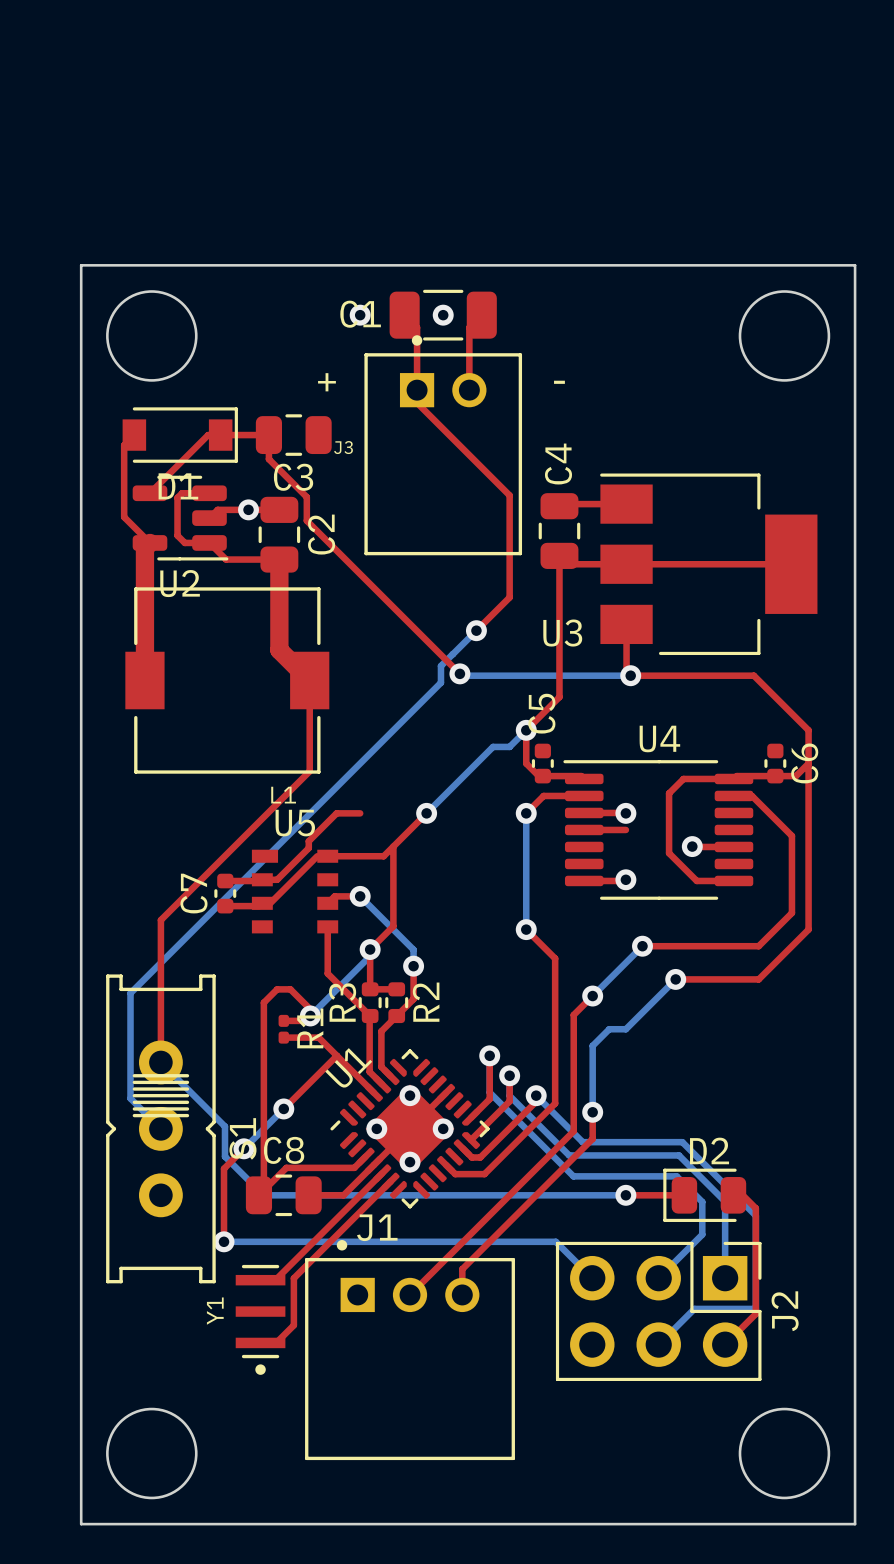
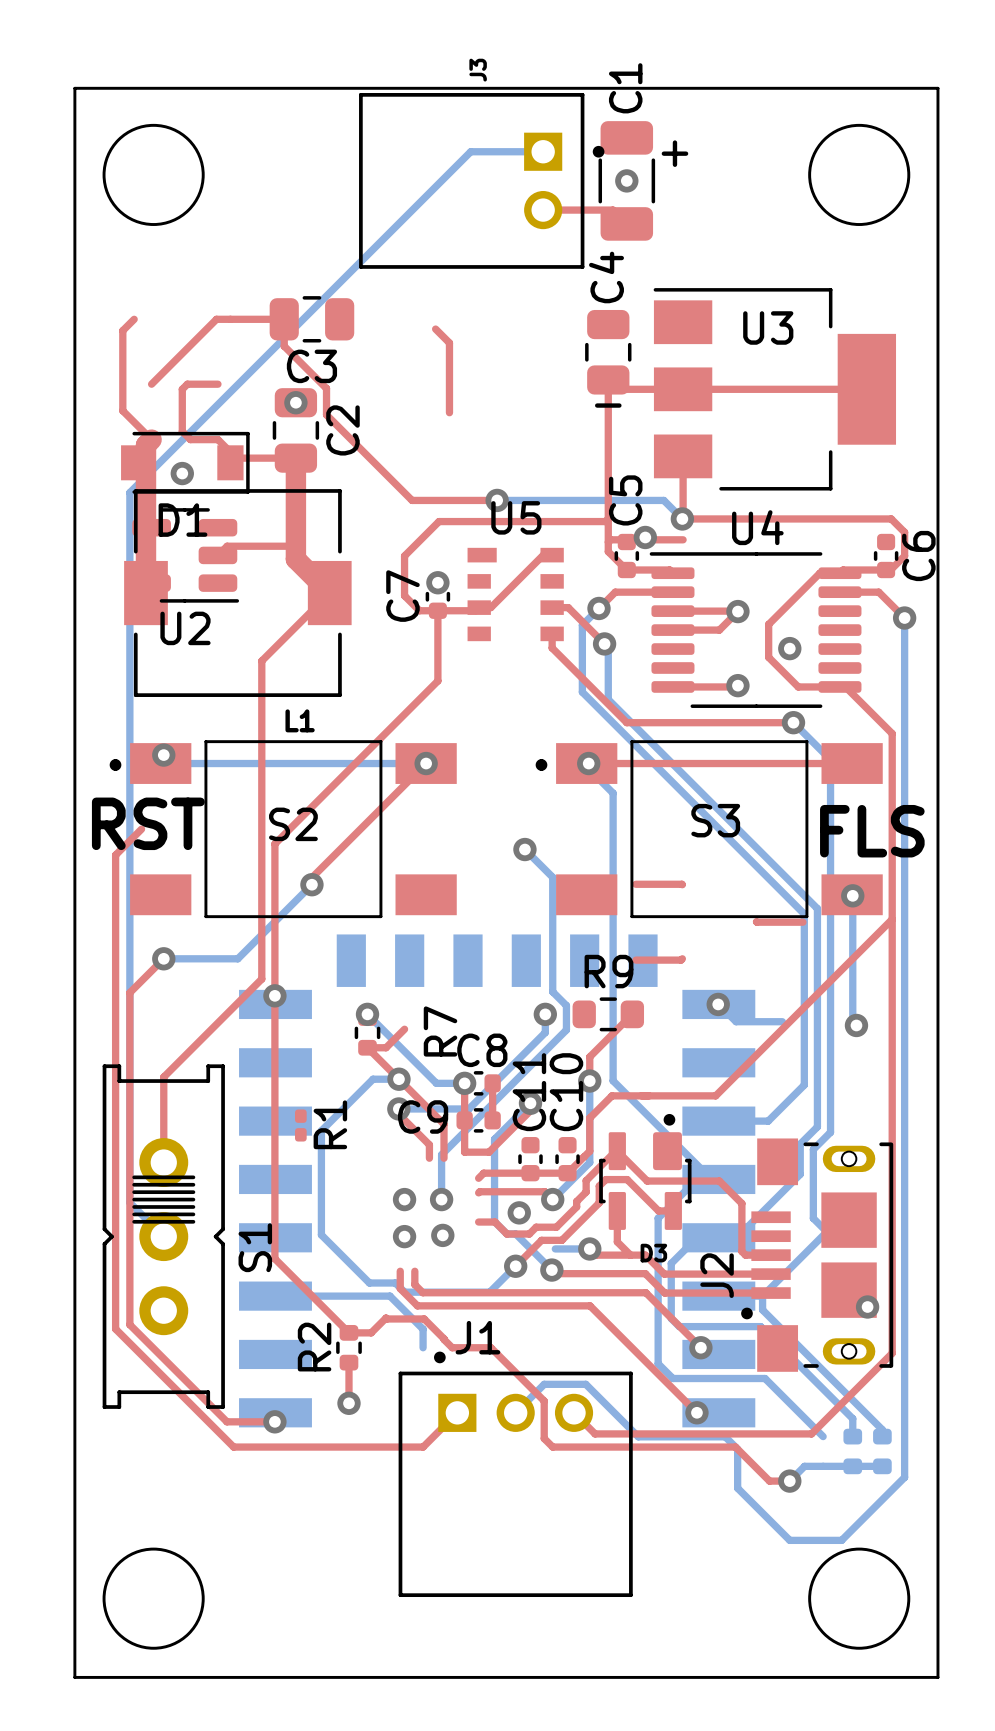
via: none -> (626, 180)
top track: none -> (543, 210) (612, 210) (626, 223)
board edge: (81, 265) (855, 265) -> (74, 273) (74, 88) (937, 88) (937, 273)
via: (360, 315) -> none
C1 rotation: 0° (443, 315) -> 90° clockwise (626, 180)
C1 position: (443, 315) -> (626, 180)
via: (443, 315) -> none
top track: (481, 315) (469, 327) (469, 390) -> none
round board edge position: (151, 335) -> (153, 174)
round board edge position: (784, 335) -> (859, 174)
top track: none -> (151, 384) (216, 319) (284, 319) (284, 346) (326, 388) (326, 414) (412, 500) (497, 500)
top track: none -> (866, 389) (617, 389) (608, 379) (608, 551) (626, 570) (669, 570) (672, 573)
via: none -> (295, 402)
text position: + (326, 382) -> + (674, 153)
top track: (410, 396) (509, 495) (509, 597) (476, 630) -> none
top track: none -> (683, 456) (682, 518) (891, 518) (904, 532) (904, 556) (890, 570) (843, 570) (839, 573) (819, 573) (768, 624) (768, 657) (798, 686) (845, 686) (892, 733) (892, 1353) (811, 1433) (595, 1433) (574, 1412)
top track: (134, 435) (124, 445) (124, 517) (149, 542) (144, 547) -> (134, 319) (122, 330) (122, 410) (151, 439) (145, 445) (145, 588)
C3 position: (293, 435) -> (311, 319)
via: none -> (182, 473)
J3 rotation: 0° (443, 445) -> 90° clockwise (481, 180)
J3 position: (443, 445) -> (481, 180)
bottom track: none -> (497, 500) (663, 500) (682, 518)
via: none -> (497, 500)
top track: none -> (608, 518) (605, 521) (438, 521) (404, 556) (404, 595) (419, 610) (476, 610) (479, 607) (490, 607) (543, 555) (552, 555)
via: none -> (682, 518)
top track: (149, 493) (208, 435) (268, 435) (268, 459) (306, 497) (306, 520) (459, 673) -> none
top track: (219, 493) (182, 493) (177, 497) (177, 535) (184, 542) (209, 542) (226, 559) (279, 559) -> none
via: none -> (645, 537)
via: (248, 509) -> none
C4 position: (559, 531) -> (608, 352)
C2 position: (279, 534) -> (295, 430)
via: none -> (437, 582)
top track: (144, 551) (144, 680) -> none
top track: none -> (672, 592) (615, 592) (599, 608)
top track: none -> (839, 592) (878, 592) (904, 618)
top track: (279, 559) (279, 650) (309, 680) (309, 771) (160, 920) (160, 985) -> (217, 384) (187, 384) (182, 389) (182, 431) (190, 439) (217, 439) (236, 458) (295, 458) (295, 559) (329, 593) (261, 660) (261, 979) (163, 1077)
top track: none -> (552, 607) (568, 607) (604, 643)
U3 position: (708, 564) -> (774, 389)
top track: (791, 564) (567, 564) (559, 555) (559, 697) (526, 730) (526, 763) (538, 776) (581, 776) (584, 778) -> none
bottom track: none -> (599, 608) (582, 625) (582, 692) (804, 914) (804, 1085) (768, 1121) (718, 1121)
via: none -> (599, 608)
top track: none -> (437, 610) (437, 680) (274, 843) (274, 1258) (348, 1332) (371, 1332) (386, 1318) (424, 1318) (452, 1347) (490, 1347) (544, 1401) (544, 1438) (552, 1447) (735, 1447) (769, 1481) (789, 1481)
top track: none -> (672, 611) (737, 611) (719, 630) (672, 630)
via: none -> (737, 611)
bottom track: none -> (904, 618) (904, 1477) (841, 1540) (789, 1540) (737, 1488) (737, 1449) (725, 1436) (638, 1436) (585, 1384) (544, 1384) (515, 1412)
via: none -> (904, 618)
top track: none -> (552, 633) (552, 648) (626, 722) (793, 722)
bottom track: none -> (604, 643) (608, 647) (608, 699) (817, 908) (817, 1126) (800, 1144) (800, 1174) (736, 1237) (696, 1237) (671, 1263) (671, 1318) (679, 1326) (760, 1326) (852, 1418) (852, 1436)
via: none -> (604, 643)
via: none -> (789, 648)
top track: (626, 624) (626, 671) (630, 675) (753, 675) (808, 730) (808, 929) (758, 979) (675, 979) -> none
bottom track: (476, 630) (440, 666) (440, 682) (130, 993) -> (543, 151) (470, 151) (129, 492) (129, 1085)
via: (476, 630) -> none
U3 name position: U3 (562, 633) -> U3 (768, 327)
top track: none -> (737, 685) (672, 686)
via: none -> (737, 685)
bottom track: none -> (793, 722) (830, 759) (830, 1132) (813, 1149) (813, 1218) (826, 1231) (762, 1296)
via: none -> (793, 722)
bottom track: (459, 673) (461, 675) (630, 675) -> none
via: (459, 673) -> none
via: (630, 675) -> none
L1 position: (227, 680) -> (237, 593)
bottom track: none -> (163, 755) (172, 763) (426, 763)
via: none -> (163, 755)
top track: none -> (426, 763) (311, 877) (311, 884)
via: none -> (426, 763)
top track: none -> (586, 763) (852, 763)
bottom track: none -> (586, 766) (613, 793) (613, 1080) (711, 1179)
bottom track: (526, 730) (509, 746) (493, 746) (426, 813) -> none
via position: (526, 730) -> (588, 763)
text: none -> RST (148, 823)
top track: none -> (141, 829) (115, 855) (115, 1329) (233, 1447) (423, 1447) (457, 1412)
S2: none -> (283, 829)
C5 position: (542, 763) -> (626, 556)
S3: none -> (709, 829)
C6 position: (775, 763) -> (886, 556)
top track: (808, 763) (796, 776) (736, 776) (733, 778) (683, 778) (669, 793) (669, 853) (696, 880) (733, 880) -> none
text: none -> FLS (872, 831)
bottom track: none -> (524, 849) (552, 877) (552, 991) (566, 1005) (566, 1029) (441, 1154) (441, 1199)
via: none -> (524, 849)
top track: (584, 795) (543, 795) (526, 813) -> none
top track: (733, 795) (751, 795) (791, 835) (791, 913) (758, 946) (642, 946) -> none
bottom track: none -> (311, 884) (237, 958) (163, 958)
via: none -> (311, 884)
top track: (360, 813) (336, 813) (308, 841) (308, 848) (277, 879) (262, 879) -> none
top track: (426, 813) (383, 856) (327, 856) -> none
via: (426, 813) -> none
bottom track: (526, 813) (526, 929) -> none
via: (526, 813) -> none
via: (625, 813) -> none
bottom track: none -> (852, 895) (852, 1021) (856, 1025)
via: none -> (852, 895)
top track: (584, 829) (625, 829) -> none
U4 position: (658, 829) -> (755, 630)
top track: none -> (892, 919) (715, 1095) (611, 1095) (589, 1118) (589, 1151) (567, 1173)
top track: (393, 846) (393, 926) (376, 942) -> none
via: (692, 846) -> none
top track: (317, 856) (270, 903) -> none
top track: none -> (163, 958) (129, 992) (129, 1324) (226, 1421) (274, 1421)
via: none -> (163, 958)
via: (625, 879) -> none
top track: (225, 881) (261, 881) -> none
U5 position: (295, 891) -> (515, 594)
C7 position: (225, 893) -> (437, 596)
top track: (360, 896) (334, 896) (327, 903) -> none
bottom track: (360, 896) (413, 949) (413, 966) -> none
via: (360, 896) -> none
top track: (225, 906) (259, 906) -> none
via: none -> (274, 995)
bottom track: none -> (718, 1004) (736, 1021) (782, 1021)
via: none -> (718, 1004)
top track: (327, 926) (327, 973) (370, 1016) (369, 1071) (382, 1084) -> none
bottom track: none -> (367, 1014) (436, 1083) (464, 1083)
via: none -> (367, 1014)
bottom track: none -> (545, 1014) (545, 1032) (468, 1108) (398, 1108)
top track: (526, 929) (555, 958) (555, 1103) (484, 1174) (455, 1174) (446, 1164) -> none
via position: (526, 929) -> (545, 1014)
R9: none -> (608, 1014)
top track: none -> (632, 1014) (589, 1056) (589, 1081)
via: none -> (856, 1025)
R7: none -> (367, 1032)
bottom track: (642, 946) (592, 996) -> none
via: (642, 946) -> none
top track: (370, 949) (370, 989) (396, 989) -> (397, 1036) (386, 1047) (367, 1047) (444, 1124) (444, 1158)
bottom track: (370, 949) (370, 956) (310, 1015) -> none
via: (370, 949) -> none
top track: (413, 966) (413, 999) (381, 1031) (381, 1066) (390, 1076) -> none
via: (413, 966) -> none
bottom track: (675, 979) (625, 1029) (609, 1029) (592, 1045) (592, 1112) -> none
via: (675, 979) -> none
bottom track: none -> (398, 1079) (373, 1079) (321, 1130) (321, 1234) (369, 1283) (395, 1283) (404, 1292) (489, 1292) (515, 1266)
via: none -> (398, 1079)
bottom track: none -> (589, 1081) (589, 1162) (552, 1199)
via: none -> (589, 1081)
top track: none -> (464, 1083) (464, 1152) (489, 1152) (530, 1110) (530, 1103)
via: none -> (464, 1083)
top track: none -> (492, 1083) (492, 1120)
top track: (592, 996) (573, 1014) (573, 1131) (410, 1294) -> none
via: (592, 996) -> none
R3: (370, 1002) -> none
R2 position: (396, 1002) -> (348, 1347)
R2 name position: R2 (426, 1002) -> R2 (314, 1347)
bottom track: none -> (530, 1103) (494, 1139) (494, 1221) (506, 1234) (515, 1234) (551, 1270)
via: none -> (530, 1103)
top track: none -> (398, 1108) (398, 1114) (429, 1144) (429, 1158)
via: none -> (398, 1108)
via: (310, 1015) -> none
top track: (283, 1020) (305, 1020) (310, 1015) (310, 1009) (290, 989) (277, 989) (263, 1002) (263, 1190) -> none
C9: none -> (478, 1120)
top track: (283, 1037) (318, 1037) (373, 1092) -> none
top track: (336, 1055) (283, 1108) -> none
top track: (489, 1055) (489, 1099) (471, 1117) -> none
bottom track: (489, 1055) (489, 1092) (573, 1176) (676, 1176) (702, 1201) (702, 1234) (658, 1278) -> none
via: (489, 1055) -> none
C11: none -> (530, 1159)
C10: none -> (567, 1159)
bottom track: (160, 1062) (224, 1126) (224, 1156) (263, 1195) (625, 1195) -> none
D3: none -> (645, 1171)
top track: none -> (571, 1173) (483, 1173) (478, 1178)
top track: (509, 1075) (509, 1101) (471, 1139) -> none
bottom track: (509, 1075) (509, 1095) (569, 1155) (679, 1155) (725, 1201) (725, 1278) -> none
via position: (509, 1075) -> (552, 1199)
bottom track: none -> (718, 1179) (696, 1179) (658, 1218) (658, 1363) (672, 1378) (765, 1378) (823, 1436)
part: none -> (497, 1180)
top track: none -> (478, 1192) (544, 1191) (552, 1199)
top track: (446, 1092) (343, 1195) (308, 1195) -> none
via: none -> (404, 1199)
top track: (536, 1095) (536, 1101) (480, 1157) (471, 1157) (462, 1148) -> none
bottom track: (536, 1095) (582, 1142) (682, 1142) (755, 1215) (755, 1308) (694, 1308) (658, 1344) -> none
via: (536, 1095) -> none
top track: none -> (617, 1210) (617, 1241) (630, 1255)
top track: none -> (673, 1210) (658, 1210) (627, 1179) (605, 1179) (599, 1186) (599, 1202) (561, 1240) (541, 1240) (515, 1266)
via: none -> (519, 1212)
bottom track: (283, 1108) (243, 1148) -> none
via: (283, 1108) -> none
top track: (592, 1112) (592, 1138) (462, 1269) (462, 1294) -> none
via: (592, 1112) -> none
top track: none -> (478, 1222) (494, 1222) (506, 1234) (529, 1234) (536, 1227) (556, 1227) (576, 1206) (576, 1201) (586, 1192) (586, 1180) (617, 1151) (647, 1181) (719, 1181) (741, 1203) (741, 1251) (745, 1255) (771, 1255)
via: none -> (442, 1235)
U1: (410, 1128) -> none
via: (443, 1128) -> none
bottom track: none -> (555, 1248) (589, 1248)
top track: none -> (589, 1248) (595, 1255) (645, 1255) (664, 1274) (771, 1274)
via: none -> (589, 1248)
top track: (243, 1148) (224, 1168) (224, 1241) -> none
via: (243, 1148) -> none
via: none -> (515, 1266)
top track: (365, 1156) (354, 1167) (286, 1167) (258, 1195) -> none
top track: none -> (551, 1270) (555, 1273) (645, 1273) (664, 1293) (771, 1293)
via: none -> (551, 1270)
top track: none -> (400, 1271) (400, 1288) (417, 1305) (590, 1305) (696, 1412)
top track: none -> (414, 1271) (414, 1284) (422, 1292) (645, 1292) (700, 1347)
via: (410, 1162) -> none
top track: (382, 1173) (275, 1280) (260, 1280) -> none
C8 footprint: [245, 1174, 322, 1217] -> [456, 1071, 501, 1096]
top track: (390, 1181) (293, 1278) (293, 1325) (276, 1342) (260, 1342) -> none
bottom track: none -> (275, 1296) (389, 1296) (423, 1329) (423, 1347)
bottom track: none -> (762, 1296) (762, 1309) (882, 1429) (882, 1436)
via: none -> (867, 1307)
top track: (626, 1194) (684, 1195) -> none
top track: (742, 1194) (755, 1208) (755, 1313) (725, 1344) -> none
via position: (625, 1195) -> (700, 1347)
D2: (704, 1195) -> none
bottom track: (224, 1241) (555, 1241) (592, 1278) -> none
via: (224, 1241) -> none
top track: none -> (348, 1362) (348, 1403)
J2 footprint: [555, 1241, 762, 1381] -> [741, 1138, 894, 1372]
via: none -> (348, 1403)
via: none -> (696, 1412)
via: none -> (274, 1421)
J2 name position: J2 (785, 1311) -> J2 (717, 1275)
Y1: (260, 1319) -> none
part: none -> (852, 1451)
part: none -> (882, 1451)
bottom track: none -> (882, 1466) (804, 1466) (789, 1481)
via: none -> (789, 1481)
J1 position: (410, 1350) -> (515, 1474)

